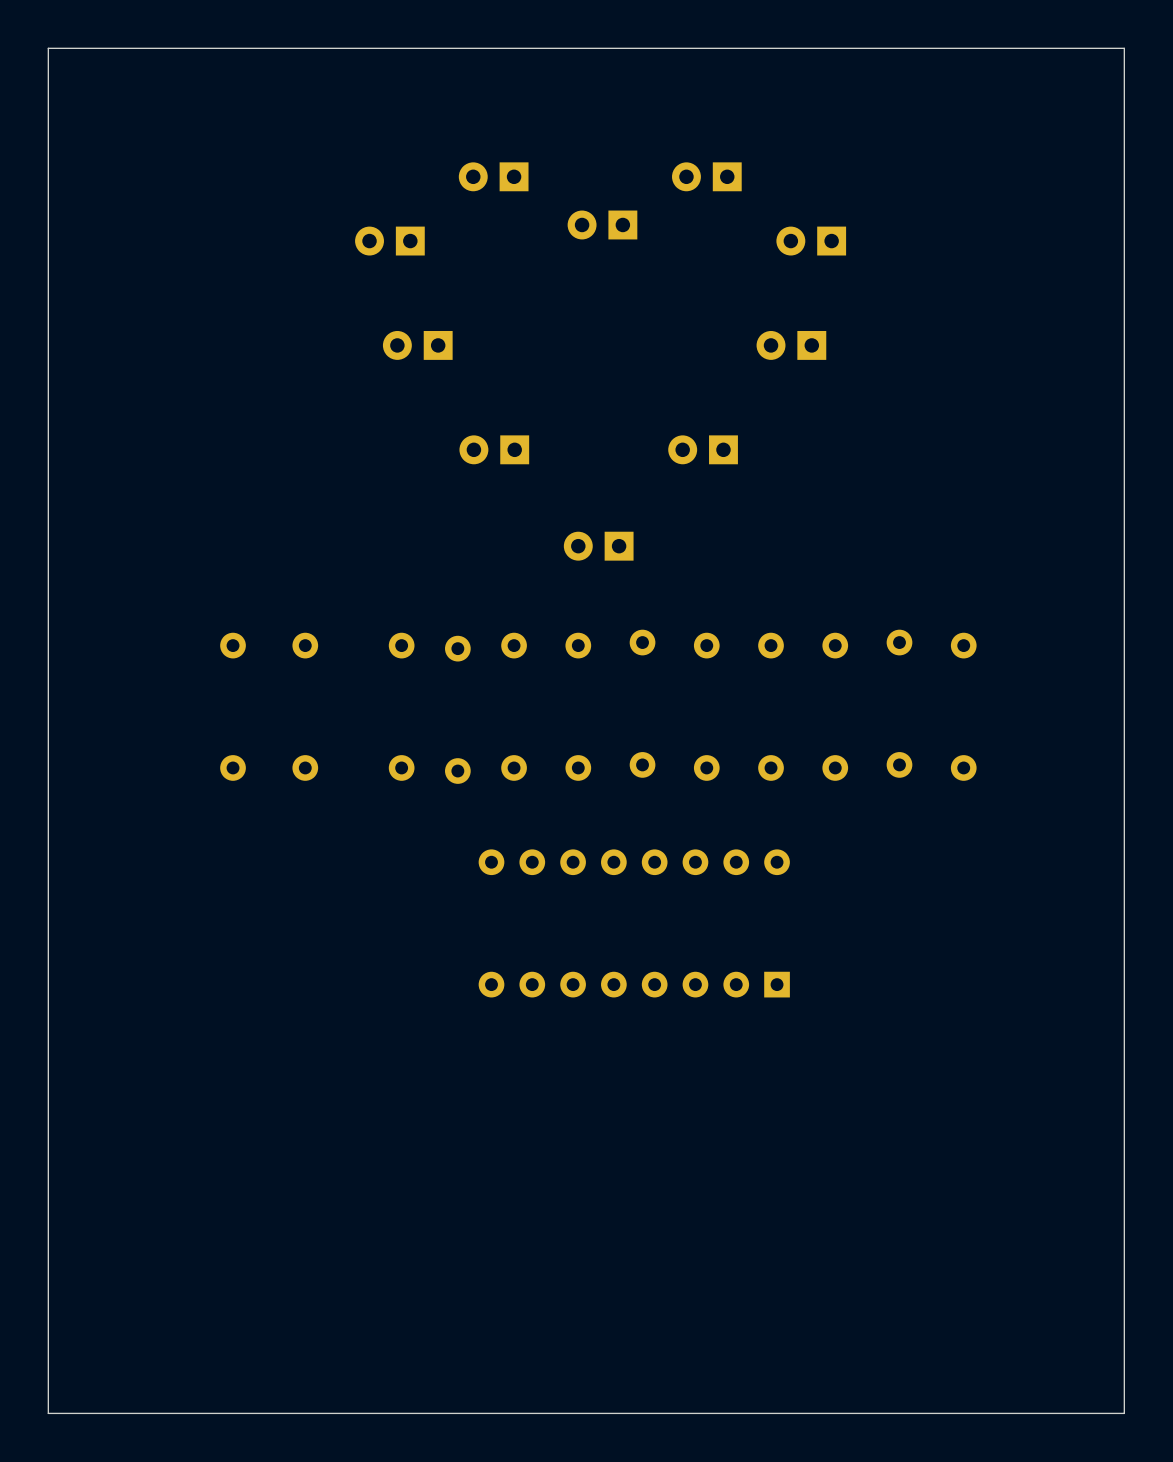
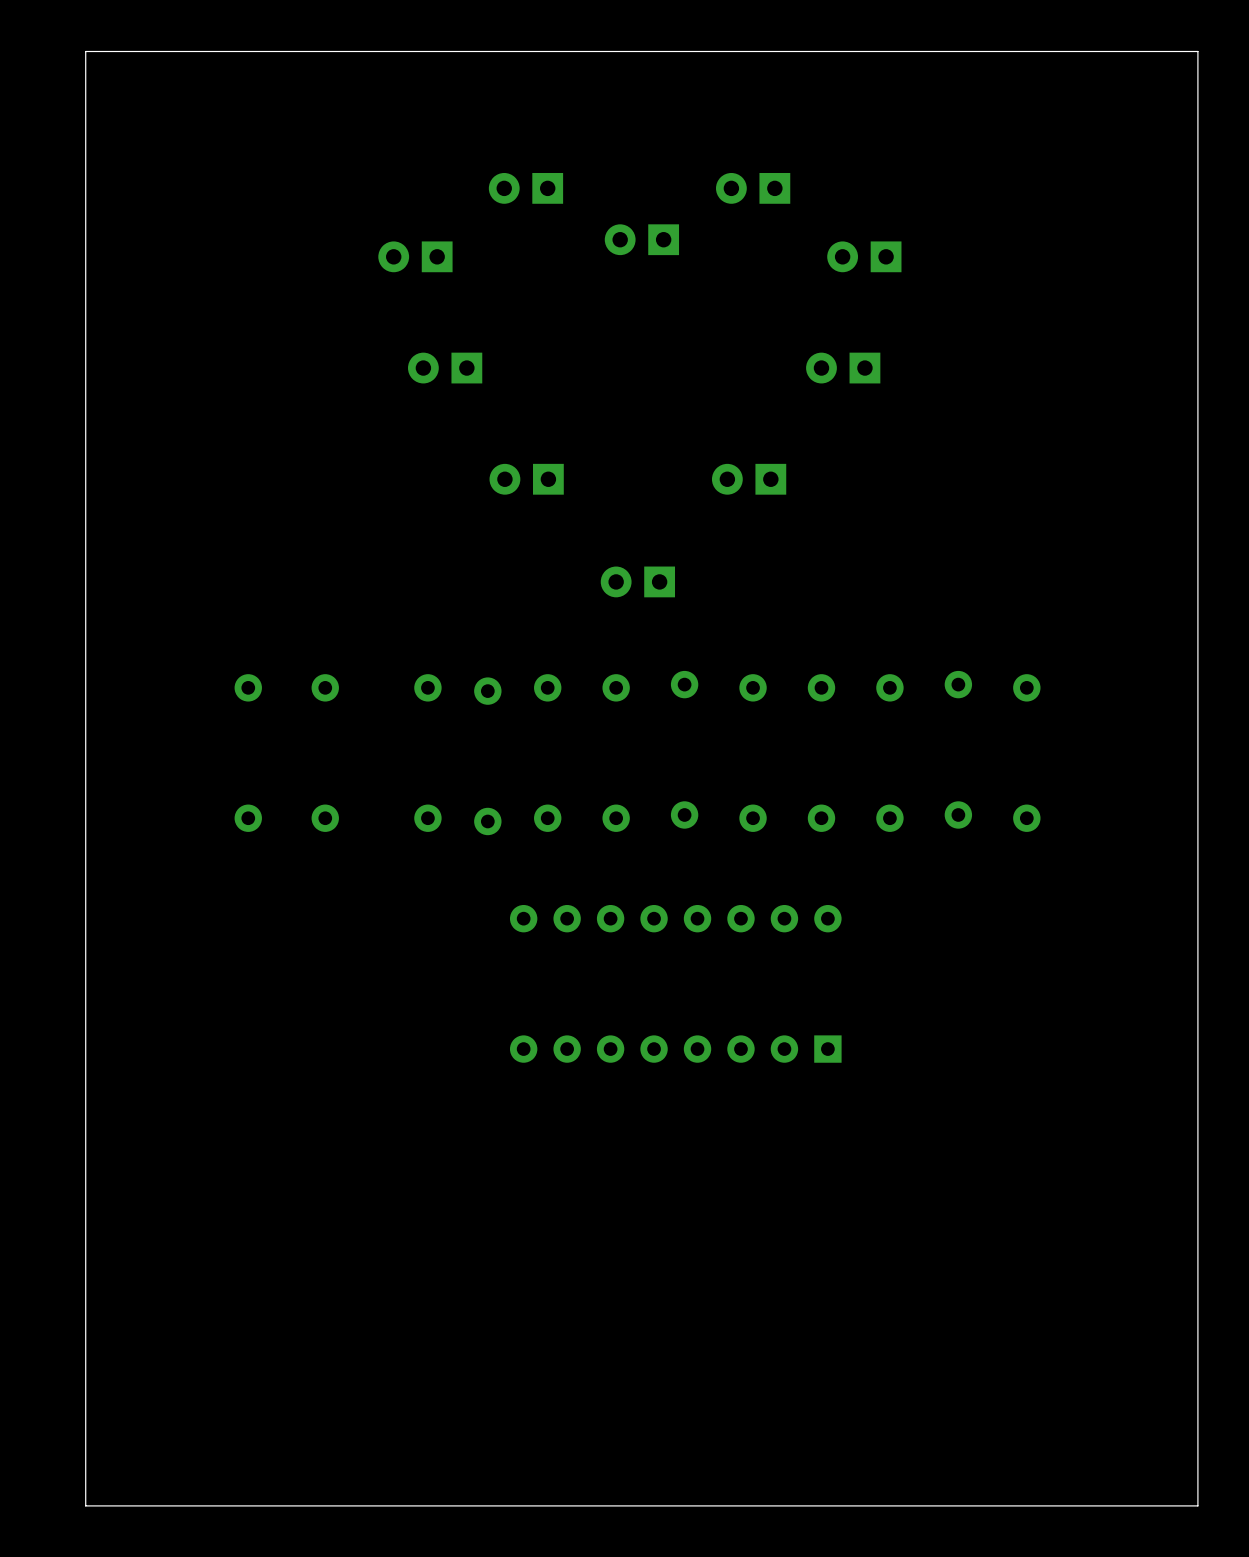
board edge: (80, 48) (48, 48) (48, 1413) (80, 1413) -> (85, 51) (85, 1505)

